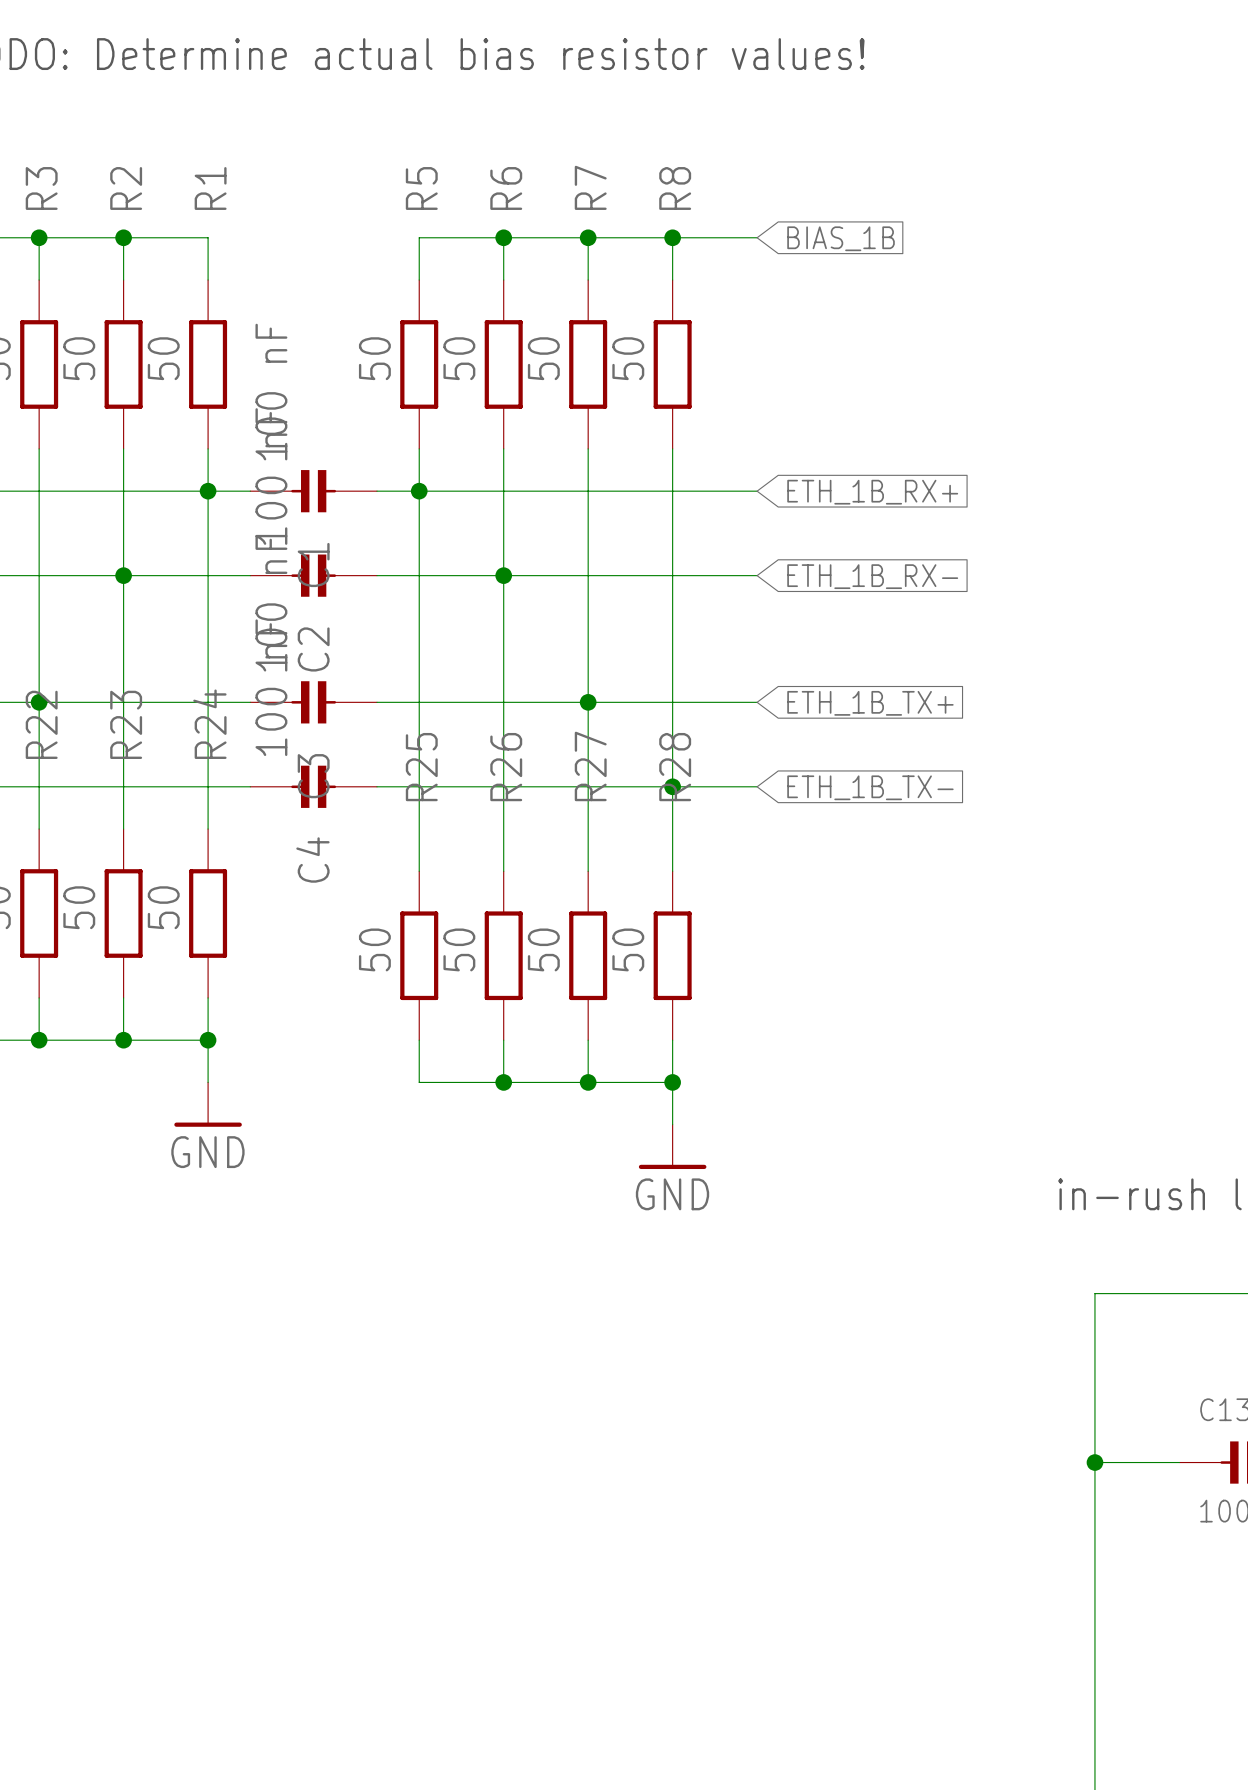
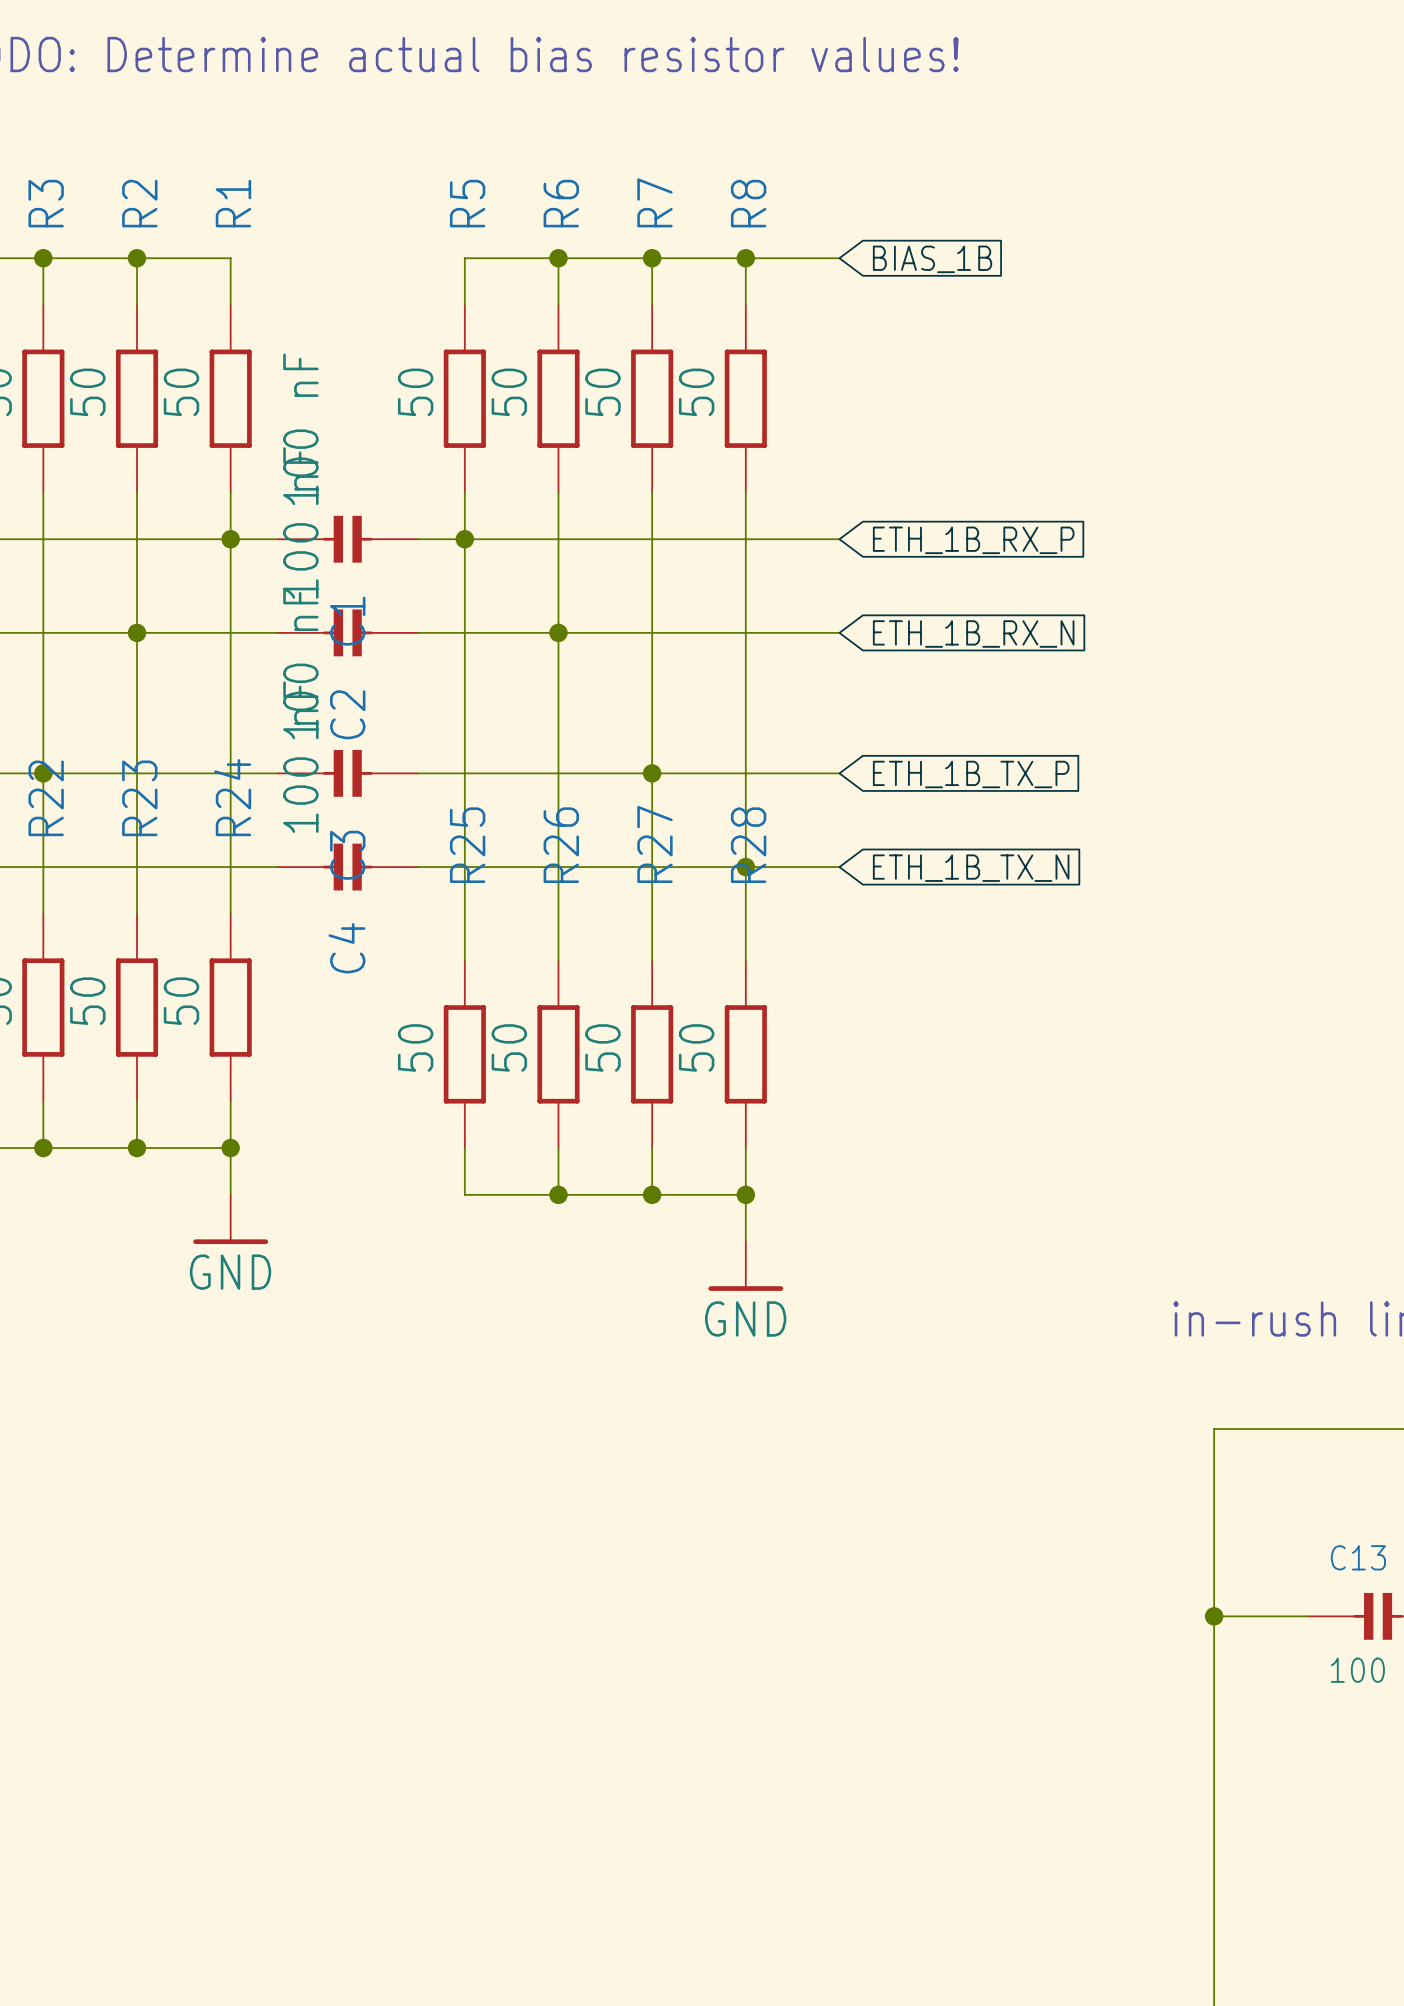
global label: ETH_1B_RX+ (872, 492) -> ETH_1B_RX_P (973, 540)
global label: ETH_1B_RX- (872, 576) -> ETH_1B_RX_N (973, 634)
global label: ETH_1B_TX+ (870, 703) -> ETH_1B_TX_P (971, 774)
global label: ETH_1B_TX- (870, 787) -> ETH_1B_TX_N (971, 868)

